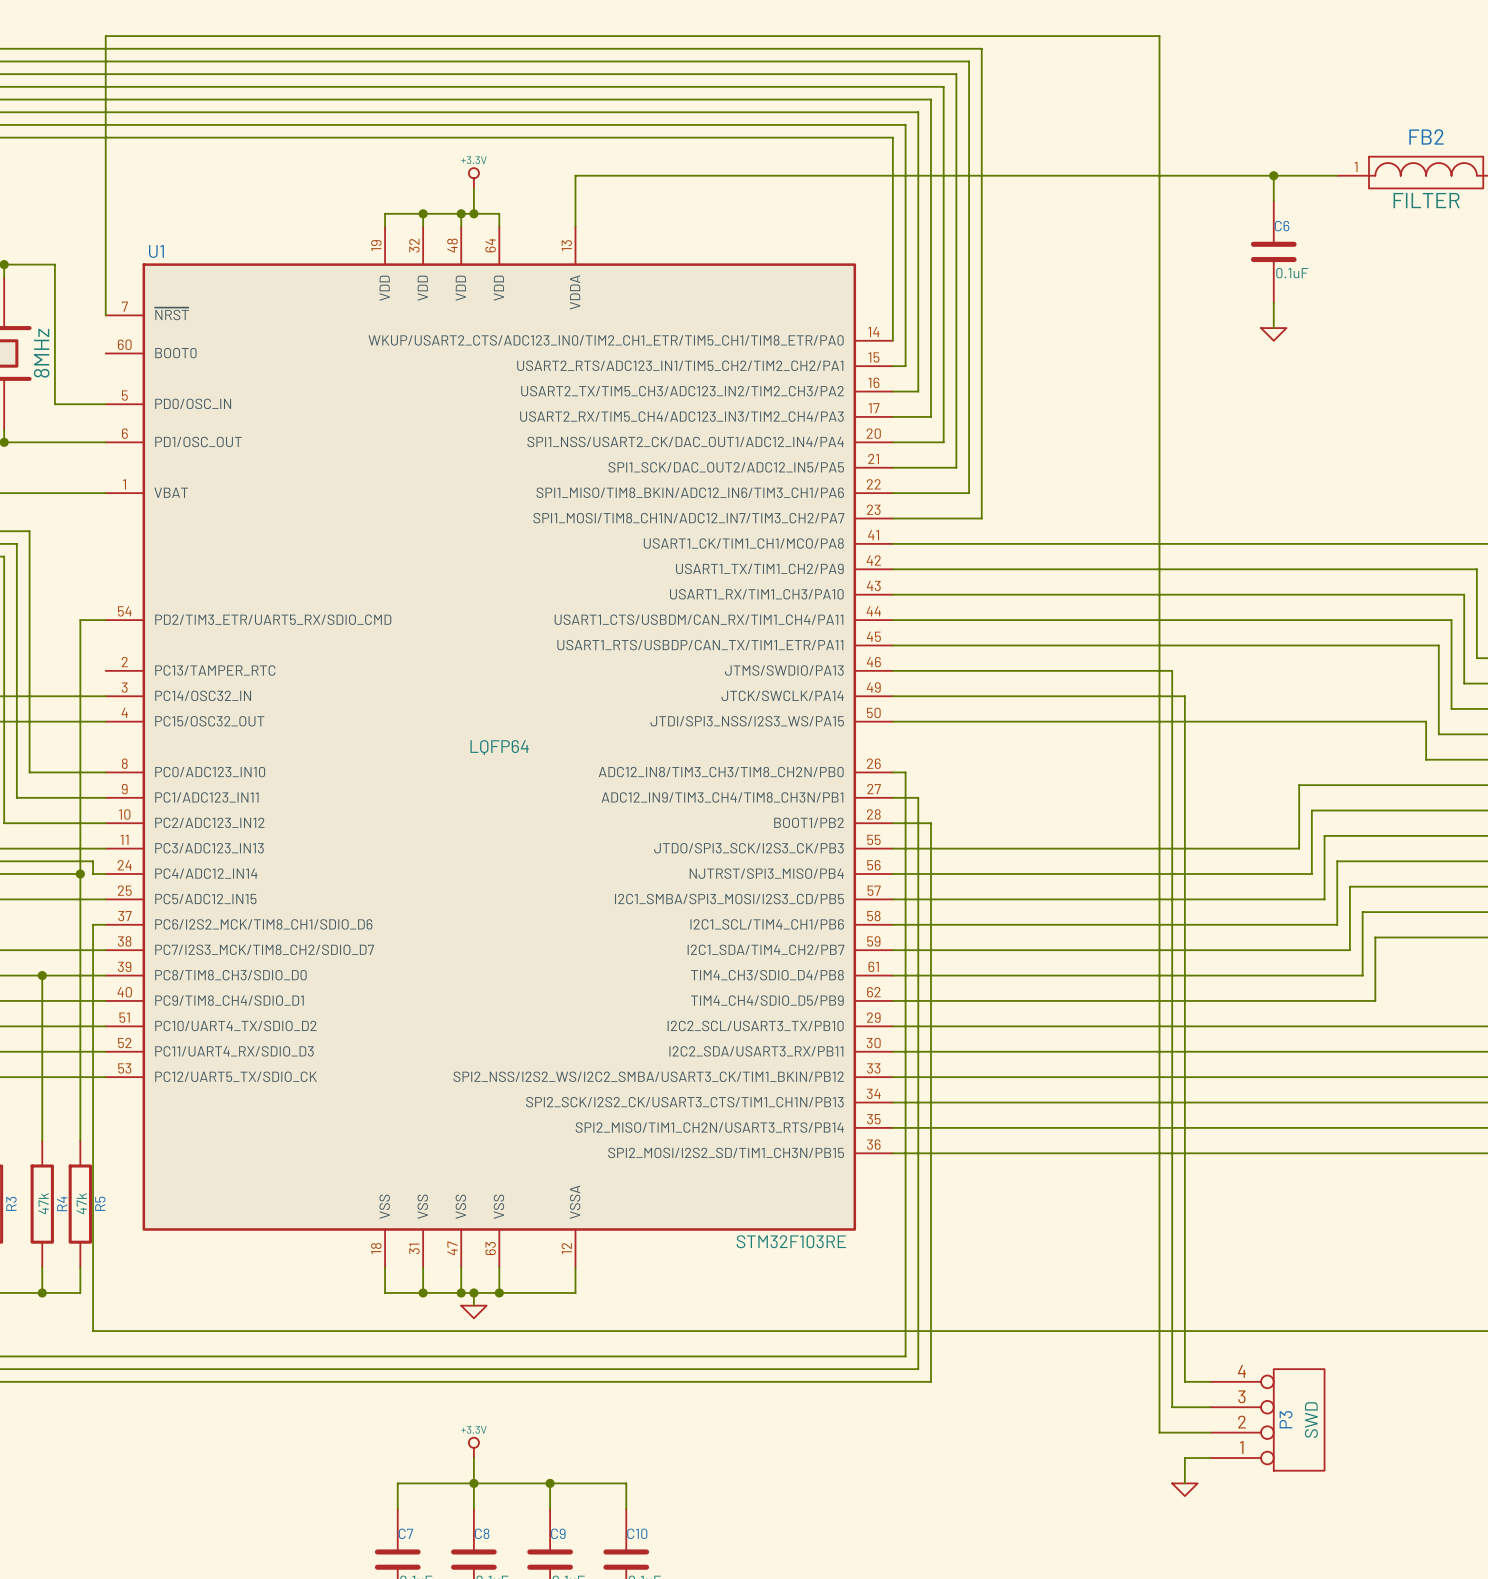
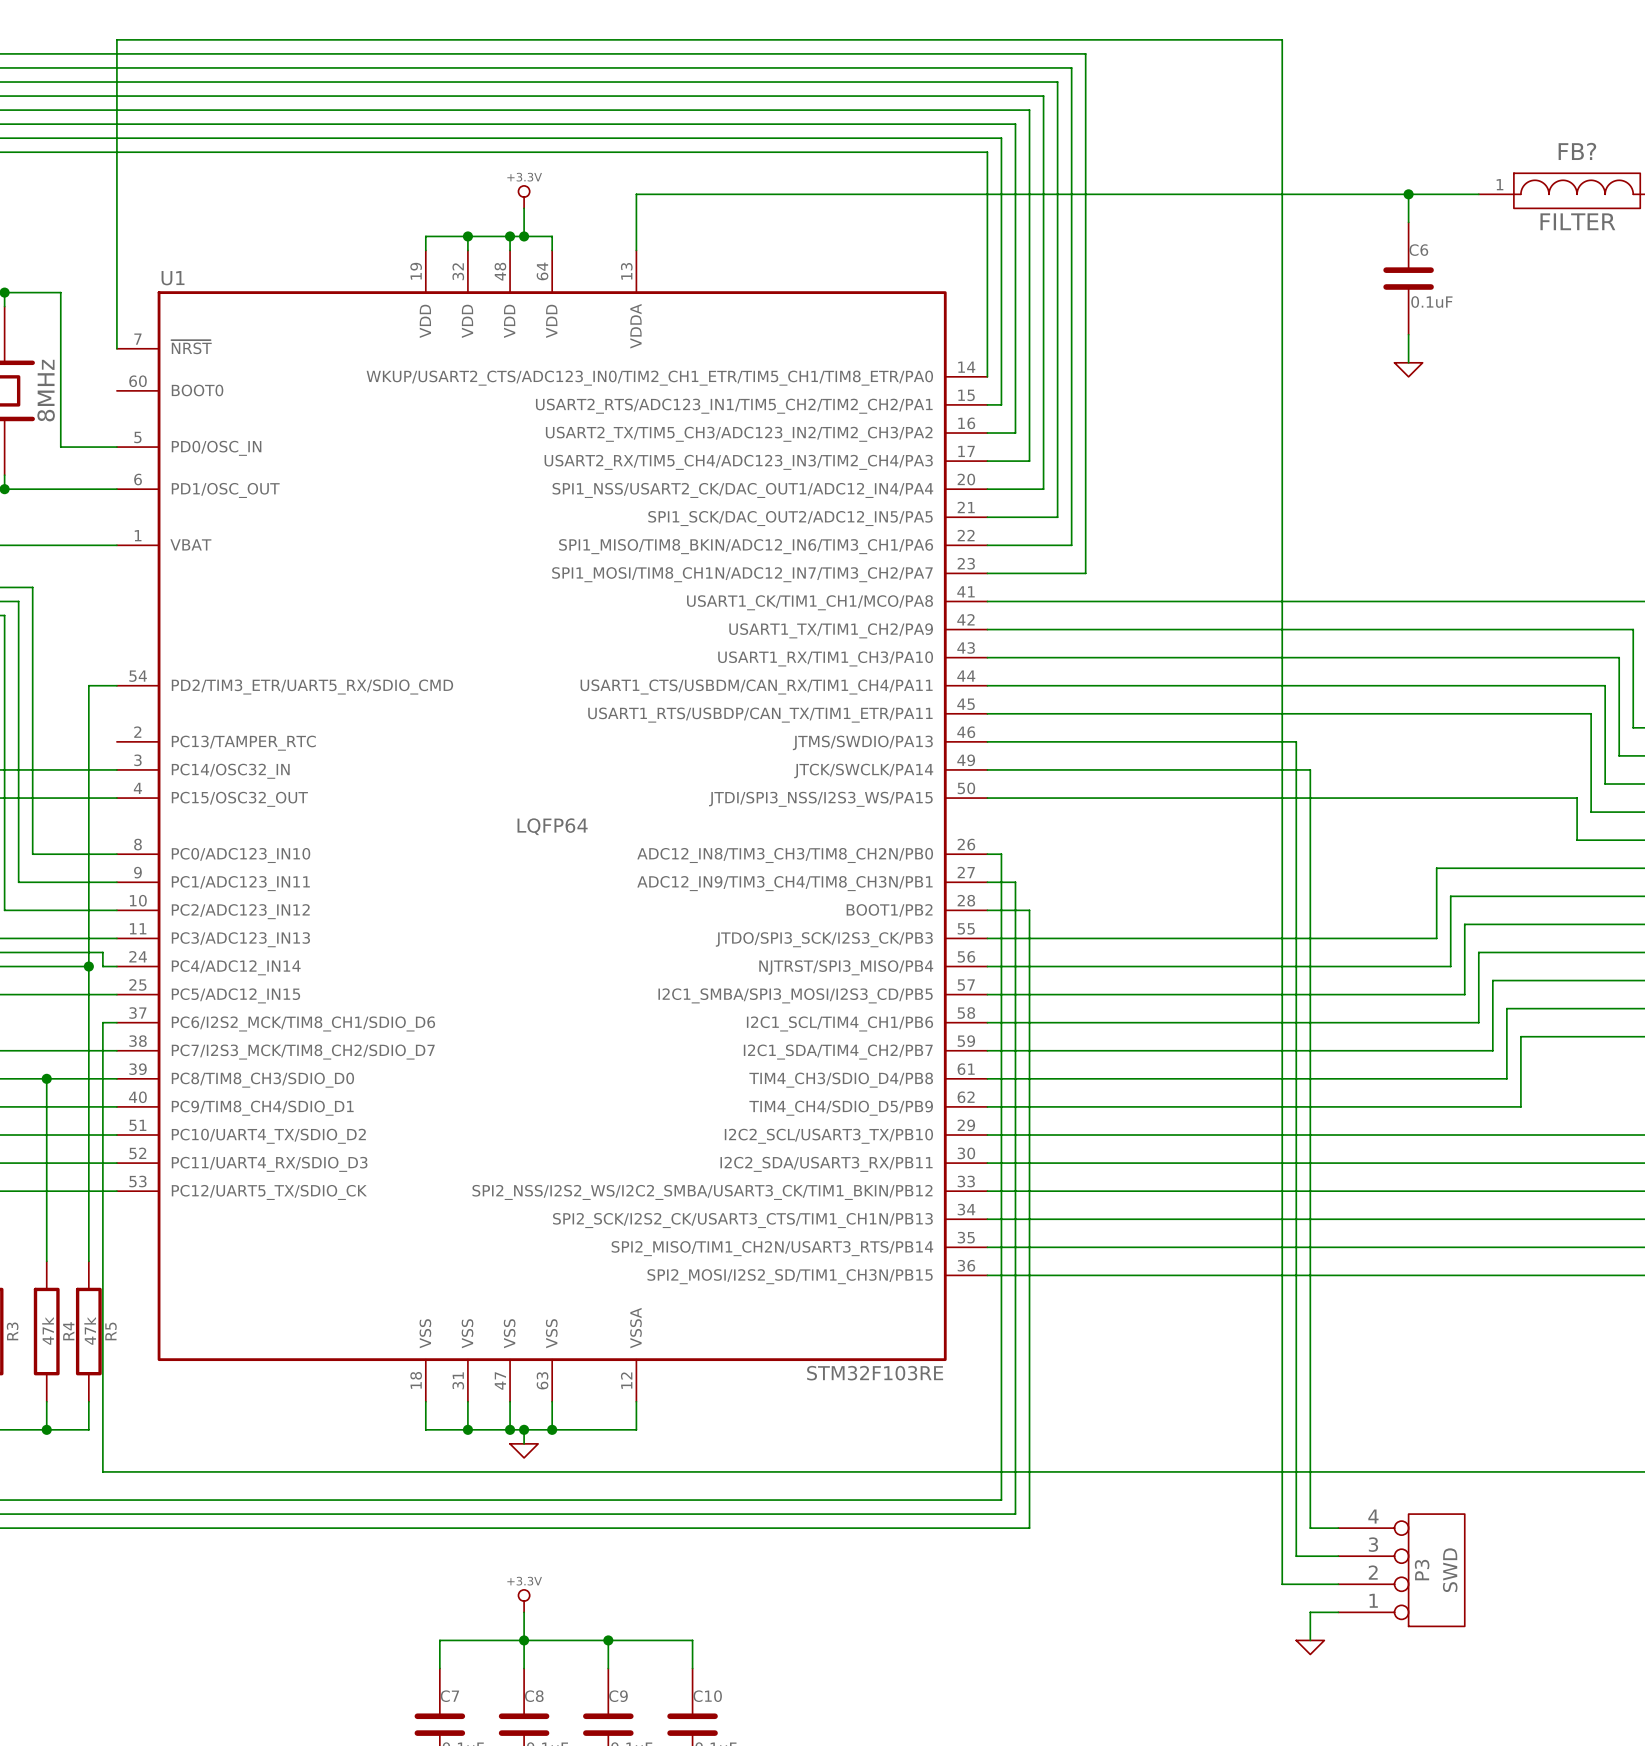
FB2 name: FB2 (1426, 136) -> FB? (1577, 151)

